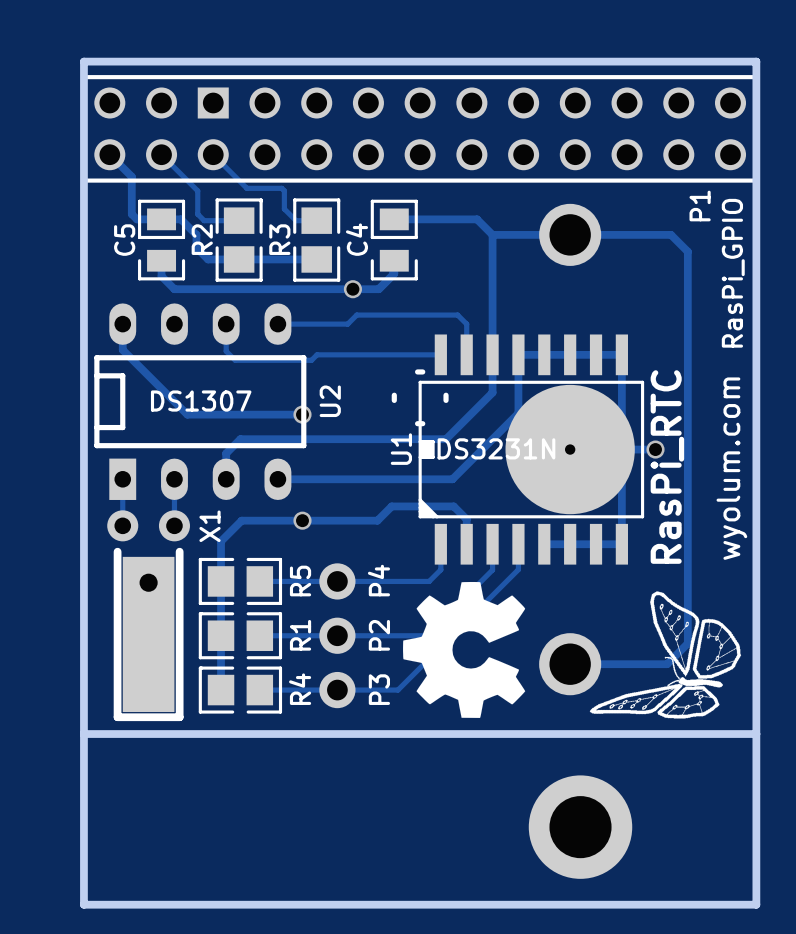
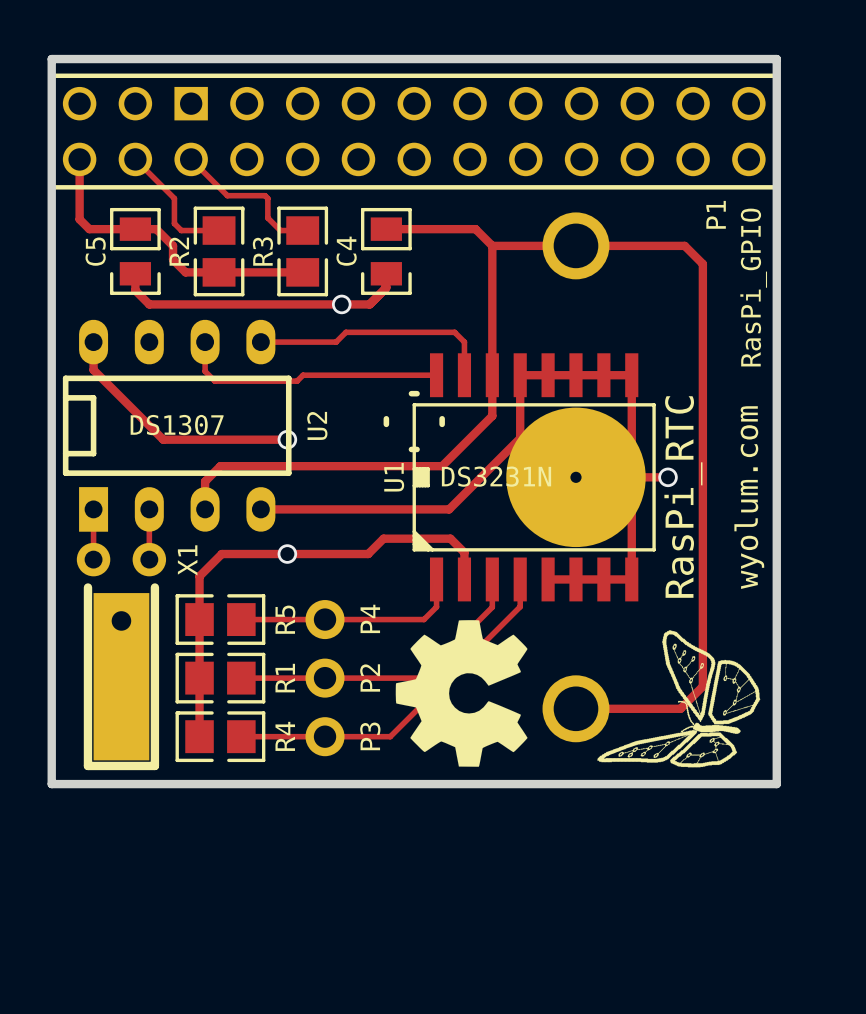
track: (109, 154) (131, 176) (131, 214) (136, 219) -> (79, 159) (79, 219) (89, 229) (108, 229)
board edge: (83, 734) (83, 904) (756, 904) (756, 734) -> none
part: (580, 827) -> none

